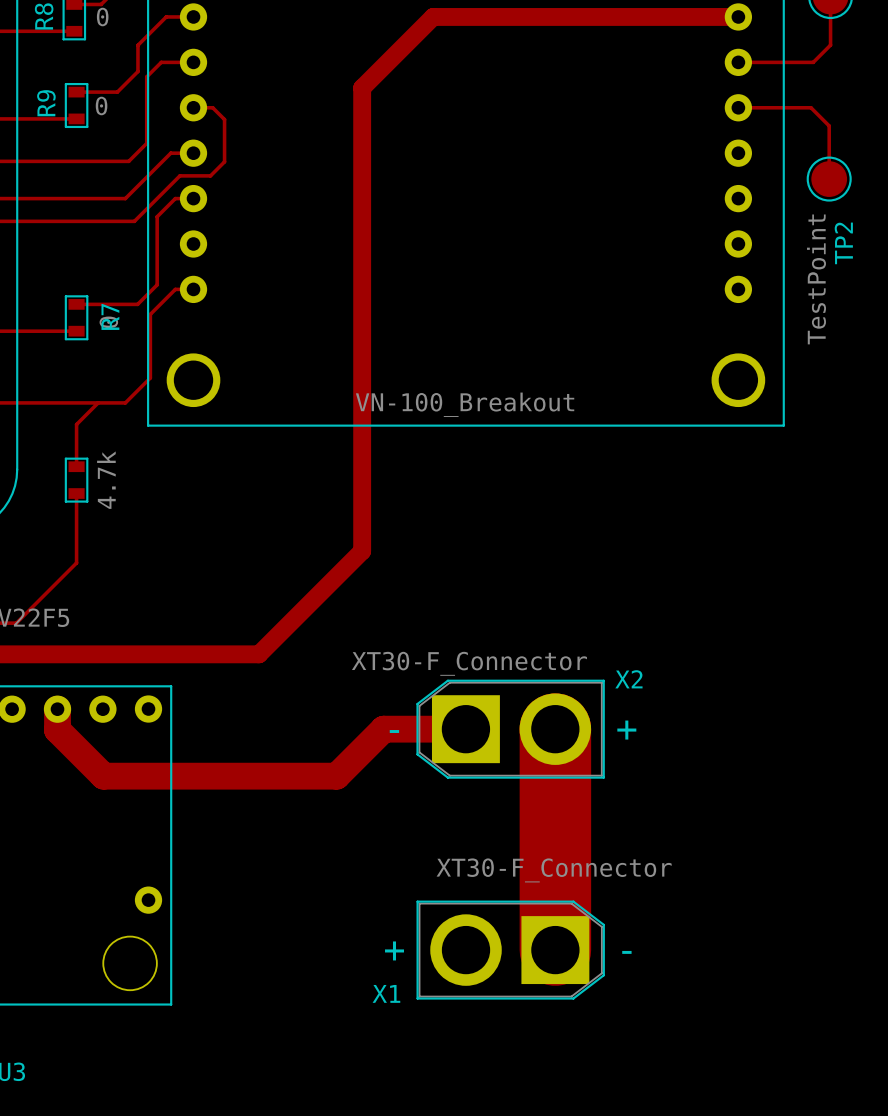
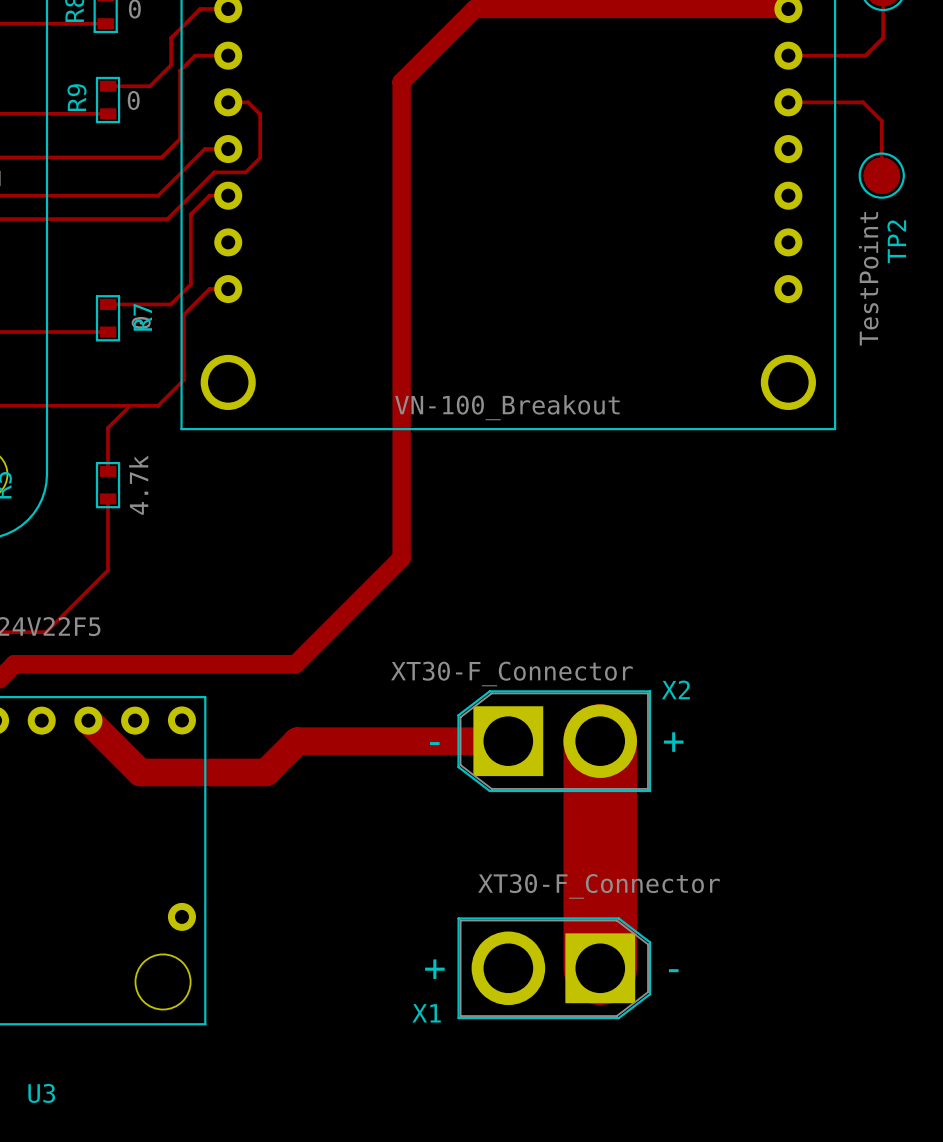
track: (57, 709) (57, 730) (103, 776) (336, 776) (383, 729) -> (88, 720) (140, 772) (265, 772) (297, 741) (423, 741)

